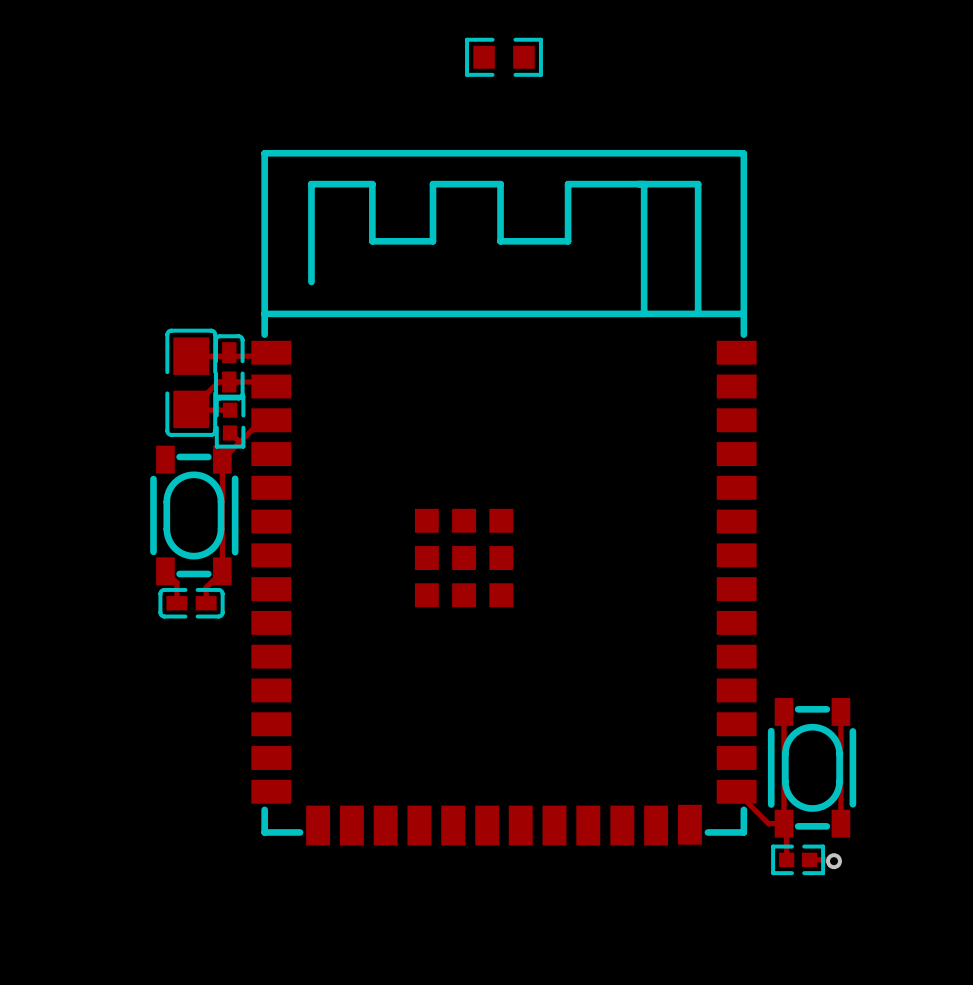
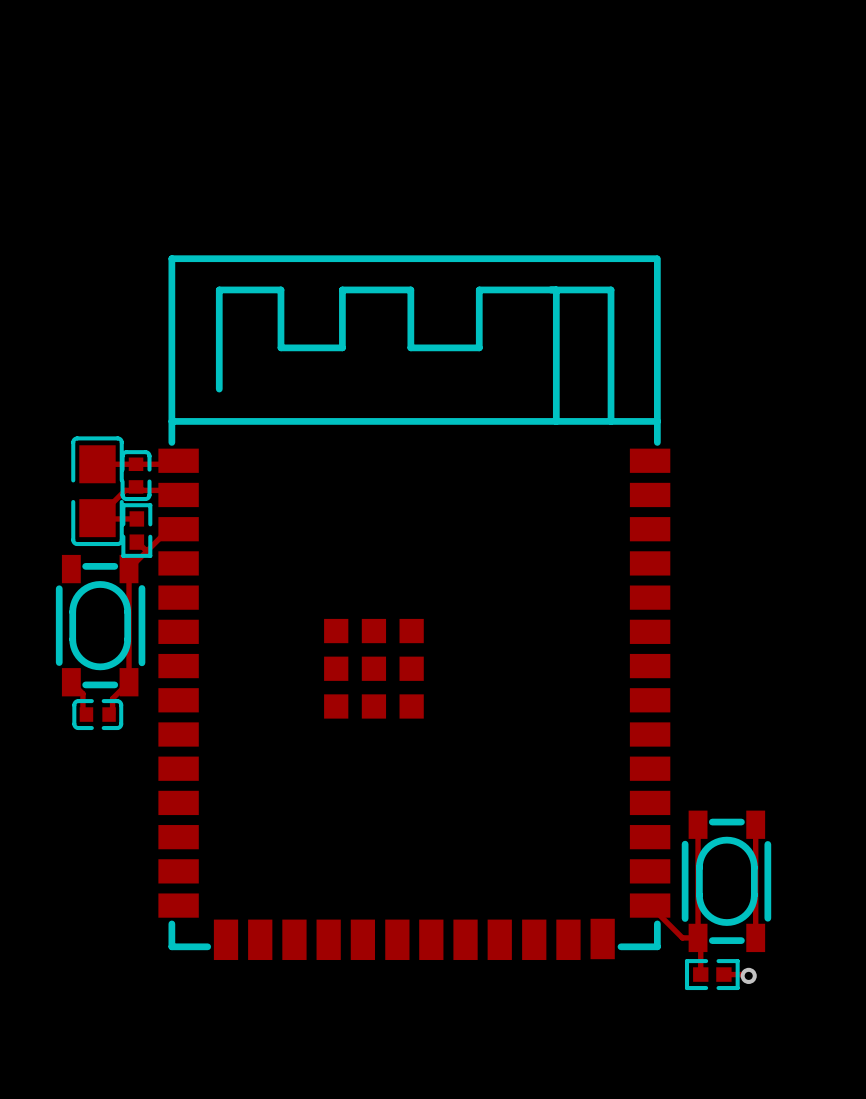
part: (503, 57) -> none
part footprint: [213, 334, 245, 401] -> [120, 450, 152, 502]
part footprint: [158, 587, 225, 619] -> [72, 699, 124, 731]

